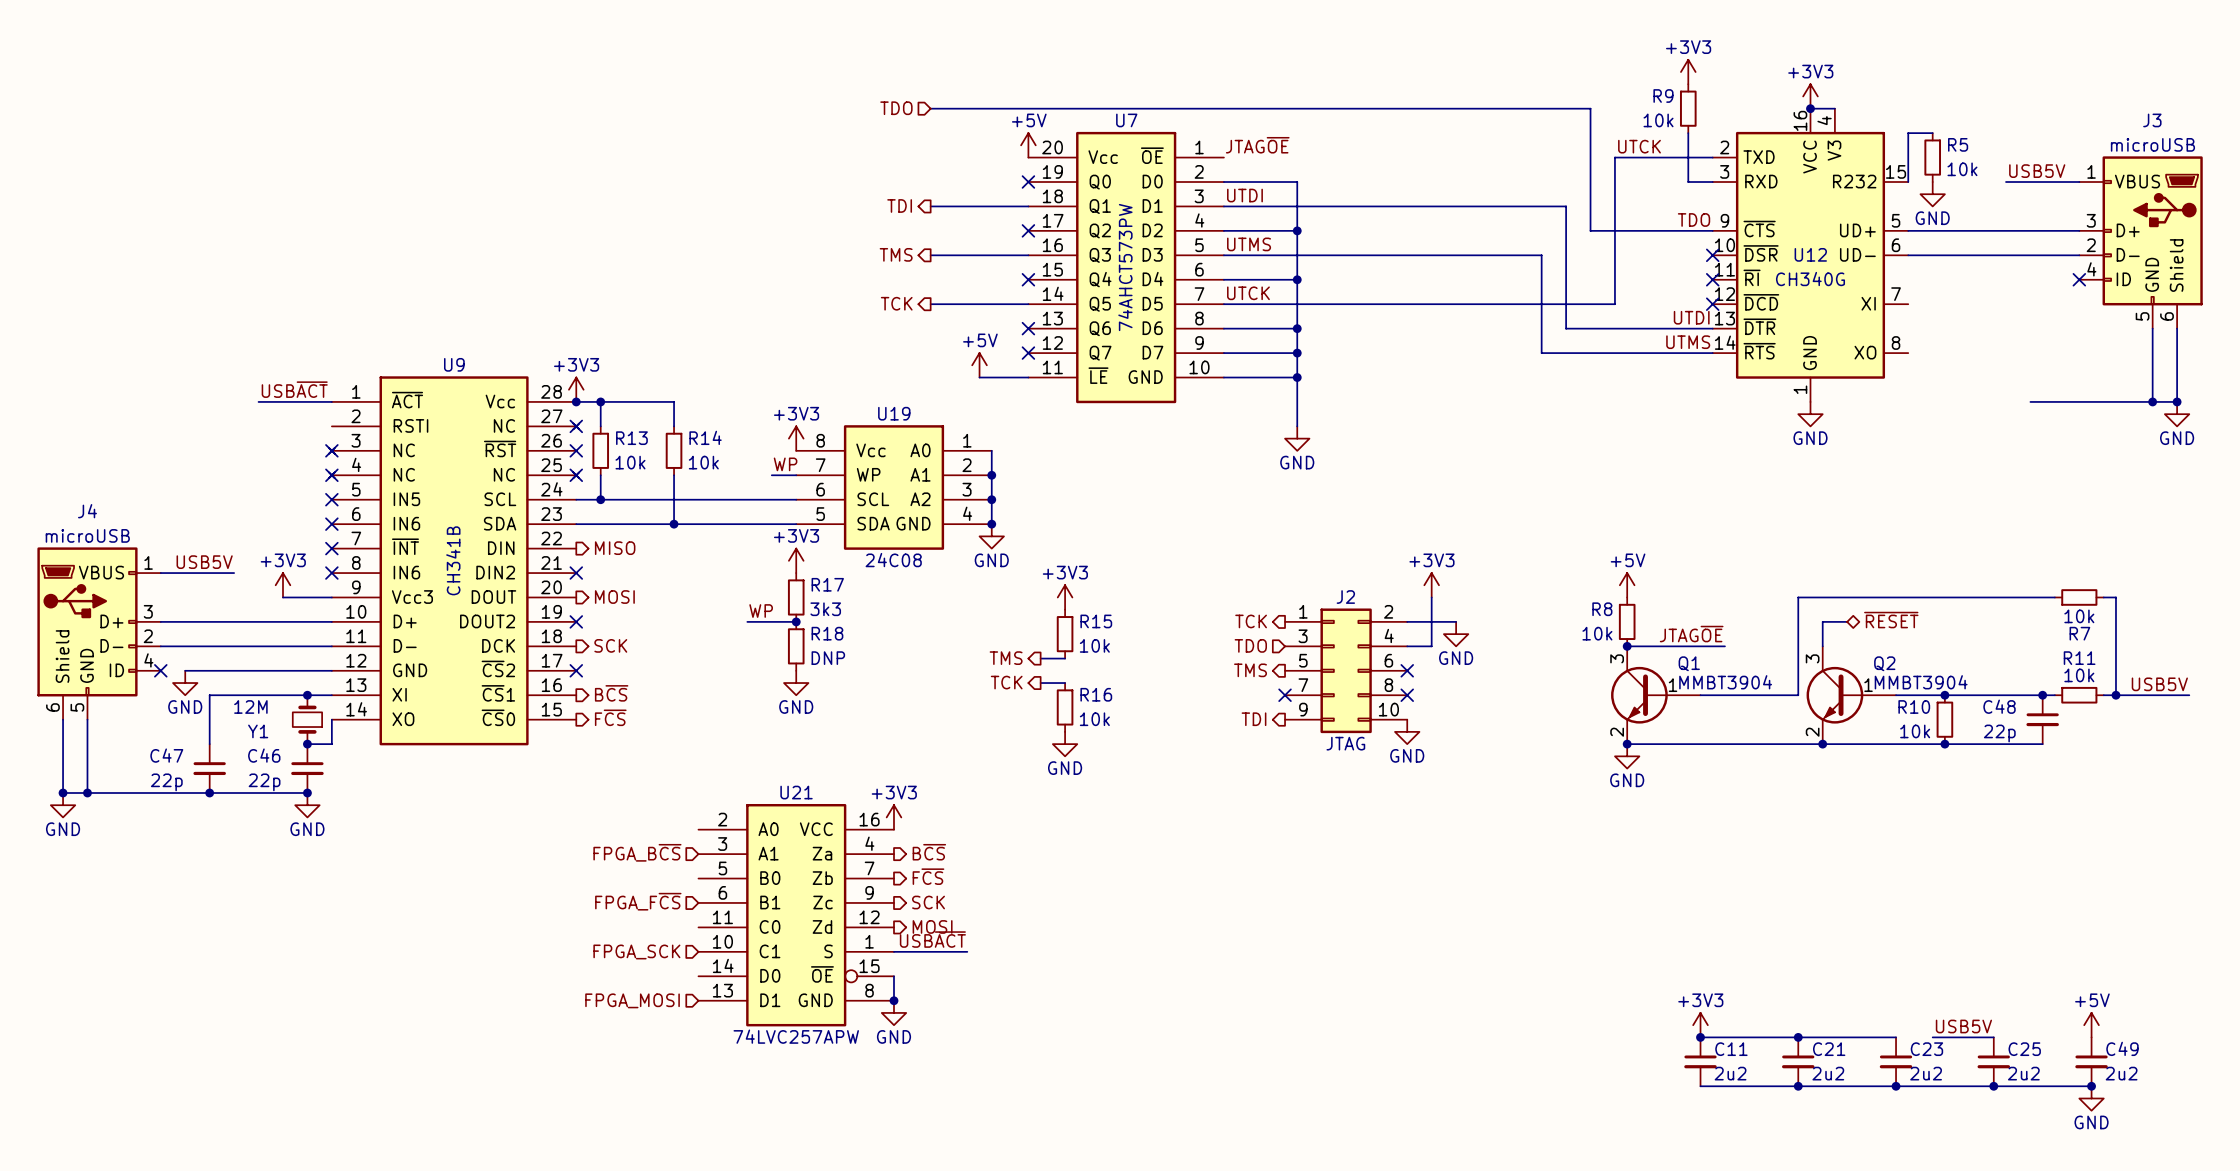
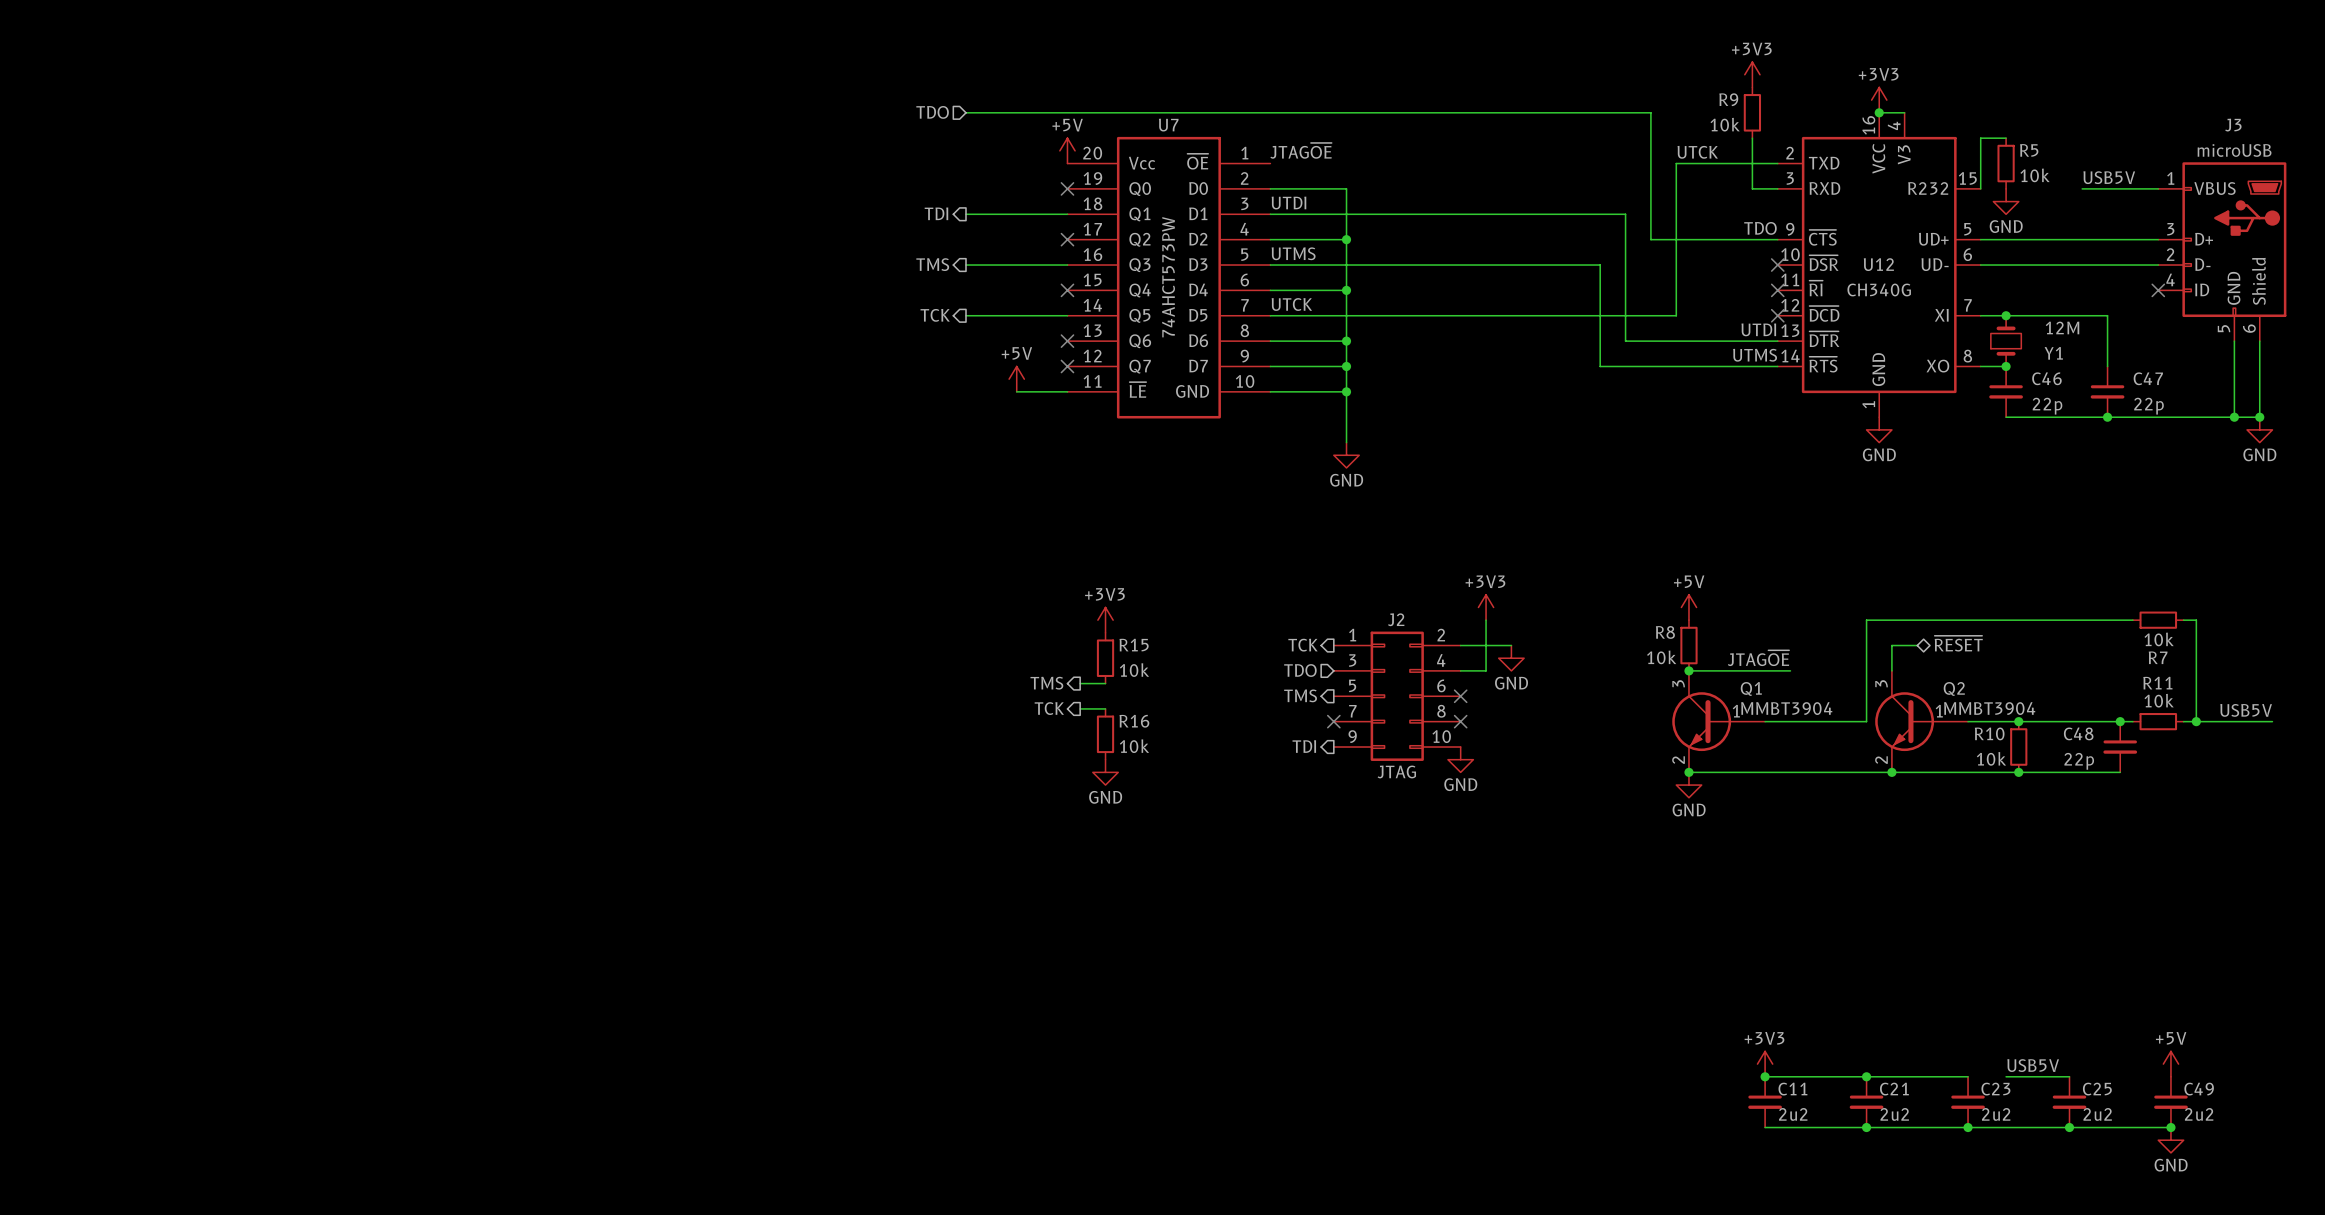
wire: none -> (1980, 315) (2107, 315) (2107, 366)
junction: none -> (2006, 315)
wire: none -> (1980, 366) (2006, 366)
junction: none -> (2006, 366)
label: USB~{ACT} (294, 389) -> none
power symbol: +3V3 (576, 389) -> none
wire: (258, 401) (331, 401) -> none
wire: (576, 401) (674, 401) (674, 426) -> none
junction: (576, 401) -> none
wire: (600, 401) (600, 426) -> none
junction: (600, 401) -> none
wire: none -> (2006, 417) (2107, 417)
junction: none -> (2107, 417)
no-connect mark: (576, 426) -> none
power symbol: +3V3 (796, 438) -> none
no-connect mark: (331, 450) -> none
no-connect mark: (576, 450) -> none
R13: 10k (600, 450) -> none
R14: 10k (674, 450) -> none
wire: (991, 450) (991, 524) -> none
label: WP (785, 464) -> none
no-connect mark: (331, 475) -> none
no-connect mark: (576, 475) -> none
wire: (600, 475) (600, 499) -> none
wire: (674, 475) (674, 524) -> none
wire: (771, 475) (796, 475) -> none
junction: (991, 475) -> none
U19: 24C08 (893, 487) -> none
no-connect mark: (331, 499) -> none
wire: (576, 499) (796, 499) -> none
junction: (600, 499) -> none
junction: (991, 499) -> none
no-connect mark: (331, 524) -> none
wire: (576, 524) (796, 524) -> none
junction: (674, 524) -> none
junction: (991, 524) -> none
power symbol: GND (991, 536) -> none
no-connect mark: (331, 548) -> none
hierarchical label: MISO (615, 548) -> none
U9: CH341B (454, 560) -> none
power symbol: +3V3 (796, 560) -> none
label: USB5V (204, 562) -> none
wire: (160, 573) (234, 573) -> none
no-connect mark: (331, 573) -> none
no-connect mark: (576, 573) -> none
power symbol: +3V3 (283, 585) -> none
wire: (283, 597) (331, 597) -> none
hierarchical label: MOSI (614, 597) -> none
R17: 3k3 (796, 597) -> none
label: WP (761, 611) -> none
wire: (160, 621) (331, 621) -> none
no-connect mark: (576, 621) -> none
wire: (747, 621) (796, 621) -> none
junction: (796, 621) -> none
J4: microUSB (99, 633) -> none
hierarchical label: SCK (610, 645) -> none
wire: (160, 646) (331, 646) -> none
R18: DNP (796, 646) -> none
no-connect mark: (160, 670) -> none
wire: (185, 670) (331, 670) -> none
no-connect mark: (576, 670) -> none
power symbol: GND (185, 683) -> none
power symbol: GND (796, 683) -> none
hierarchical label: B~{CS} (611, 693) -> none
junction: (307, 695) -> none
wire: (331, 695) (209, 695) (209, 744) -> none
Y1 value position: 12M (250, 707) -> 12M (2062, 327)
hierarchical label: F~{CS} (610, 717) -> none
wire: (63, 719) (63, 792) (307, 792) -> none
wire: (87, 719) (87, 792) -> none
Y1 position: (307, 719) -> (2006, 341)
wire: (331, 719) (331, 744) (307, 744) -> none
Y1 name position: Y1 (258, 731) -> Y1 (2053, 353)
junction: (307, 744) -> none
C47 name position: C47 (166, 755) -> C47 (2148, 378)
C46 name position: C46 (264, 755) -> C46 (2046, 378)
C47 position: (209, 768) -> (2107, 391)
C46 position: (307, 768) -> (2006, 391)
C47 value position: 22p (166, 782) -> 22p (2148, 406)
C46 value position: 22p (264, 782) -> 22p (2047, 406)
junction: (63, 792) -> none
junction: (87, 792) -> none
junction: (209, 792) -> none
junction: (307, 792) -> none
power symbol: GND (63, 805) -> none
power symbol: GND (307, 805) -> none
power symbol: +3V3 (893, 817) -> none
hierarchical label: FPGA_B~{CS} (637, 852) -> none
hierarchical label: B~{CS} (929, 852) -> none
hierarchical label: F~{CS} (928, 876) -> none
hierarchical label: FPGA_F~{CS} (638, 901) -> none
hierarchical label: SCK (928, 902) -> none
U21: 74LVC257APW (796, 915) -> none
hierarchical label: MOSI (932, 926) -> none
label: USB~{ACT} (932, 939) -> none
hierarchical label: FPGA_SCK (636, 951) -> none
wire: (893, 951) (967, 951) -> none
wire: (893, 976) (893, 1000) -> none
hierarchical label: FPGA_MOSI (632, 1000) -> none
junction: (893, 1000) -> none
power symbol: GND (893, 1012) -> none

